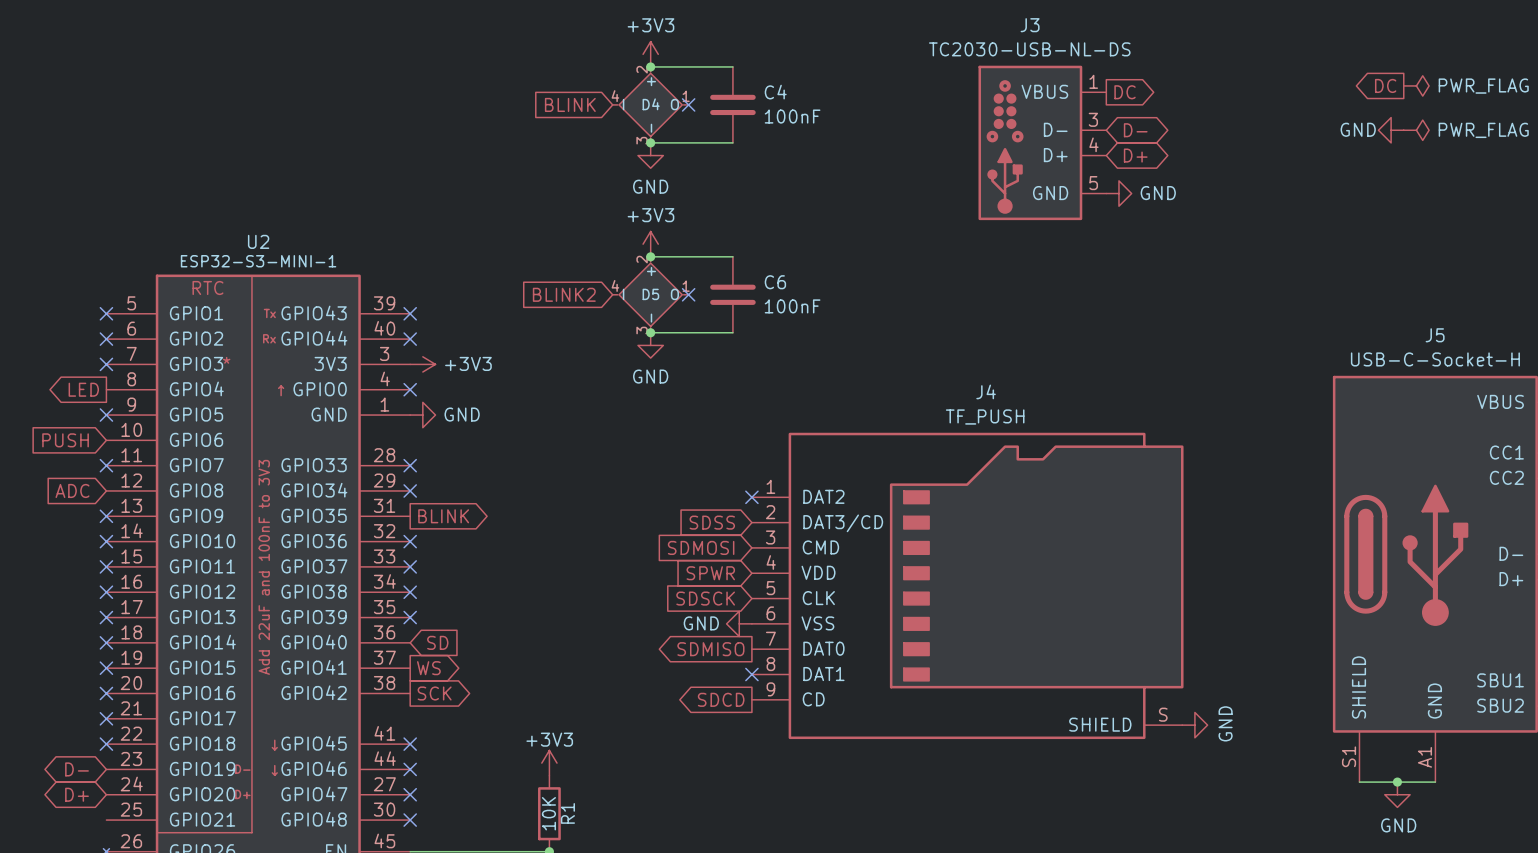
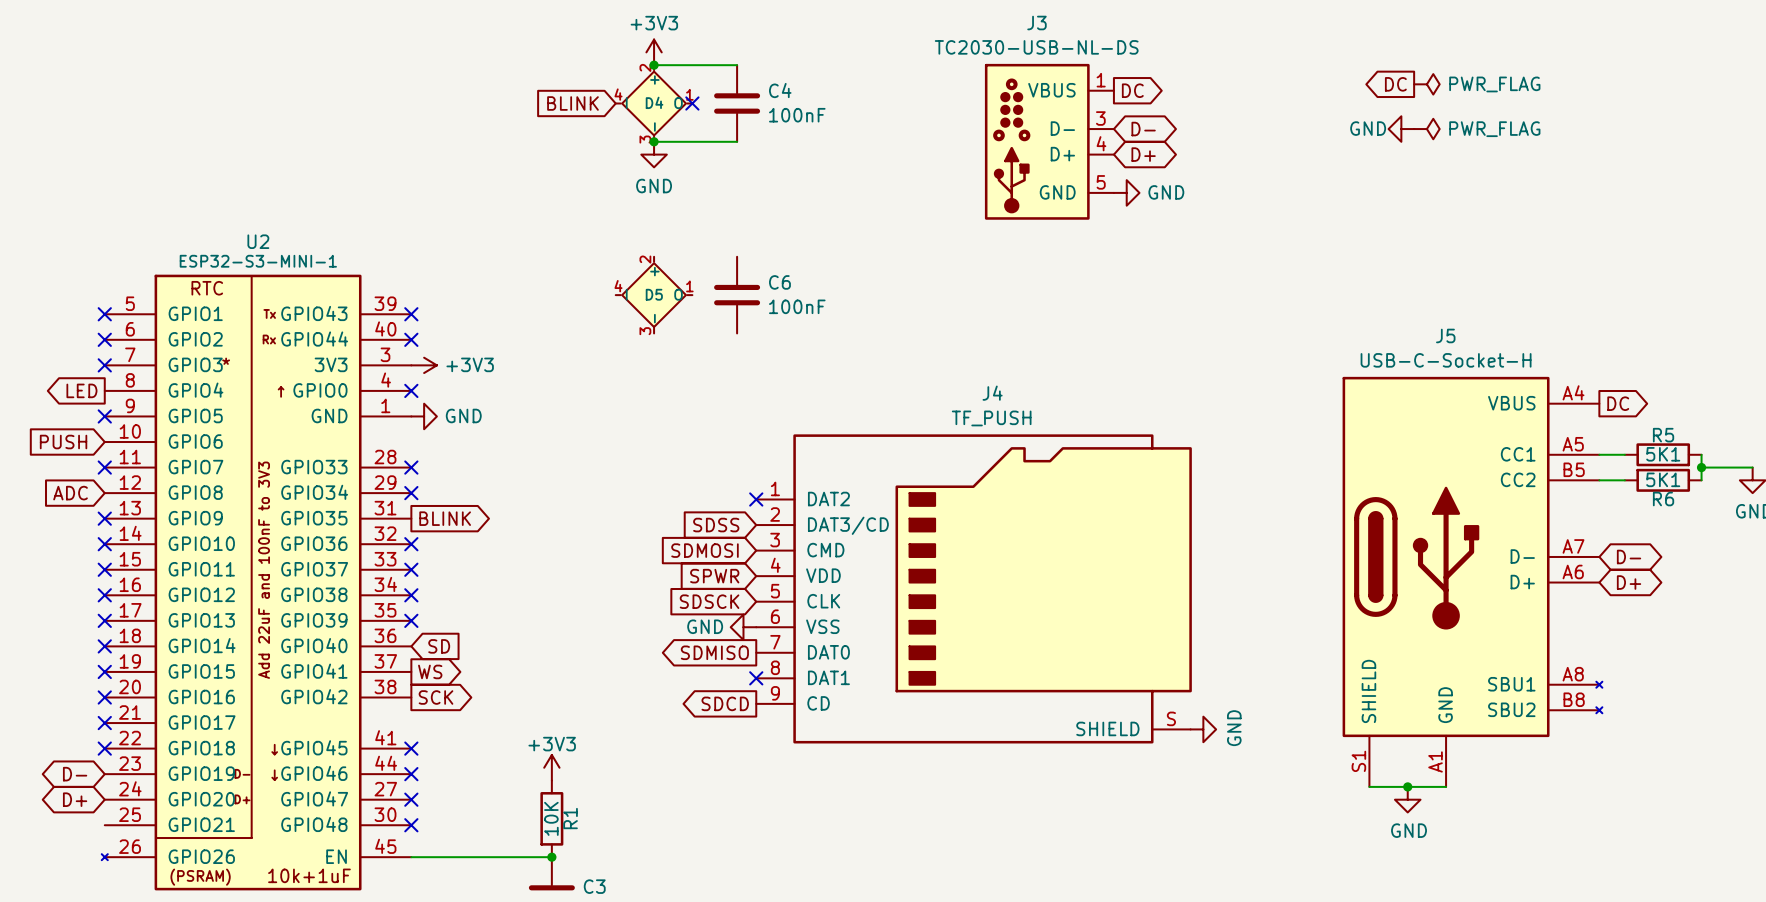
power symbol: +3V3 (650, 244) -> none
wire: (650, 256) (732, 256) -> none
junction: (650, 256) -> none
global label: BLINK2 (564, 294) -> none
no-connect mark: (688, 294) -> none
wire: (650, 332) (732, 332) -> none
junction: (650, 332) -> none
power symbol: GND (650, 345) -> none

